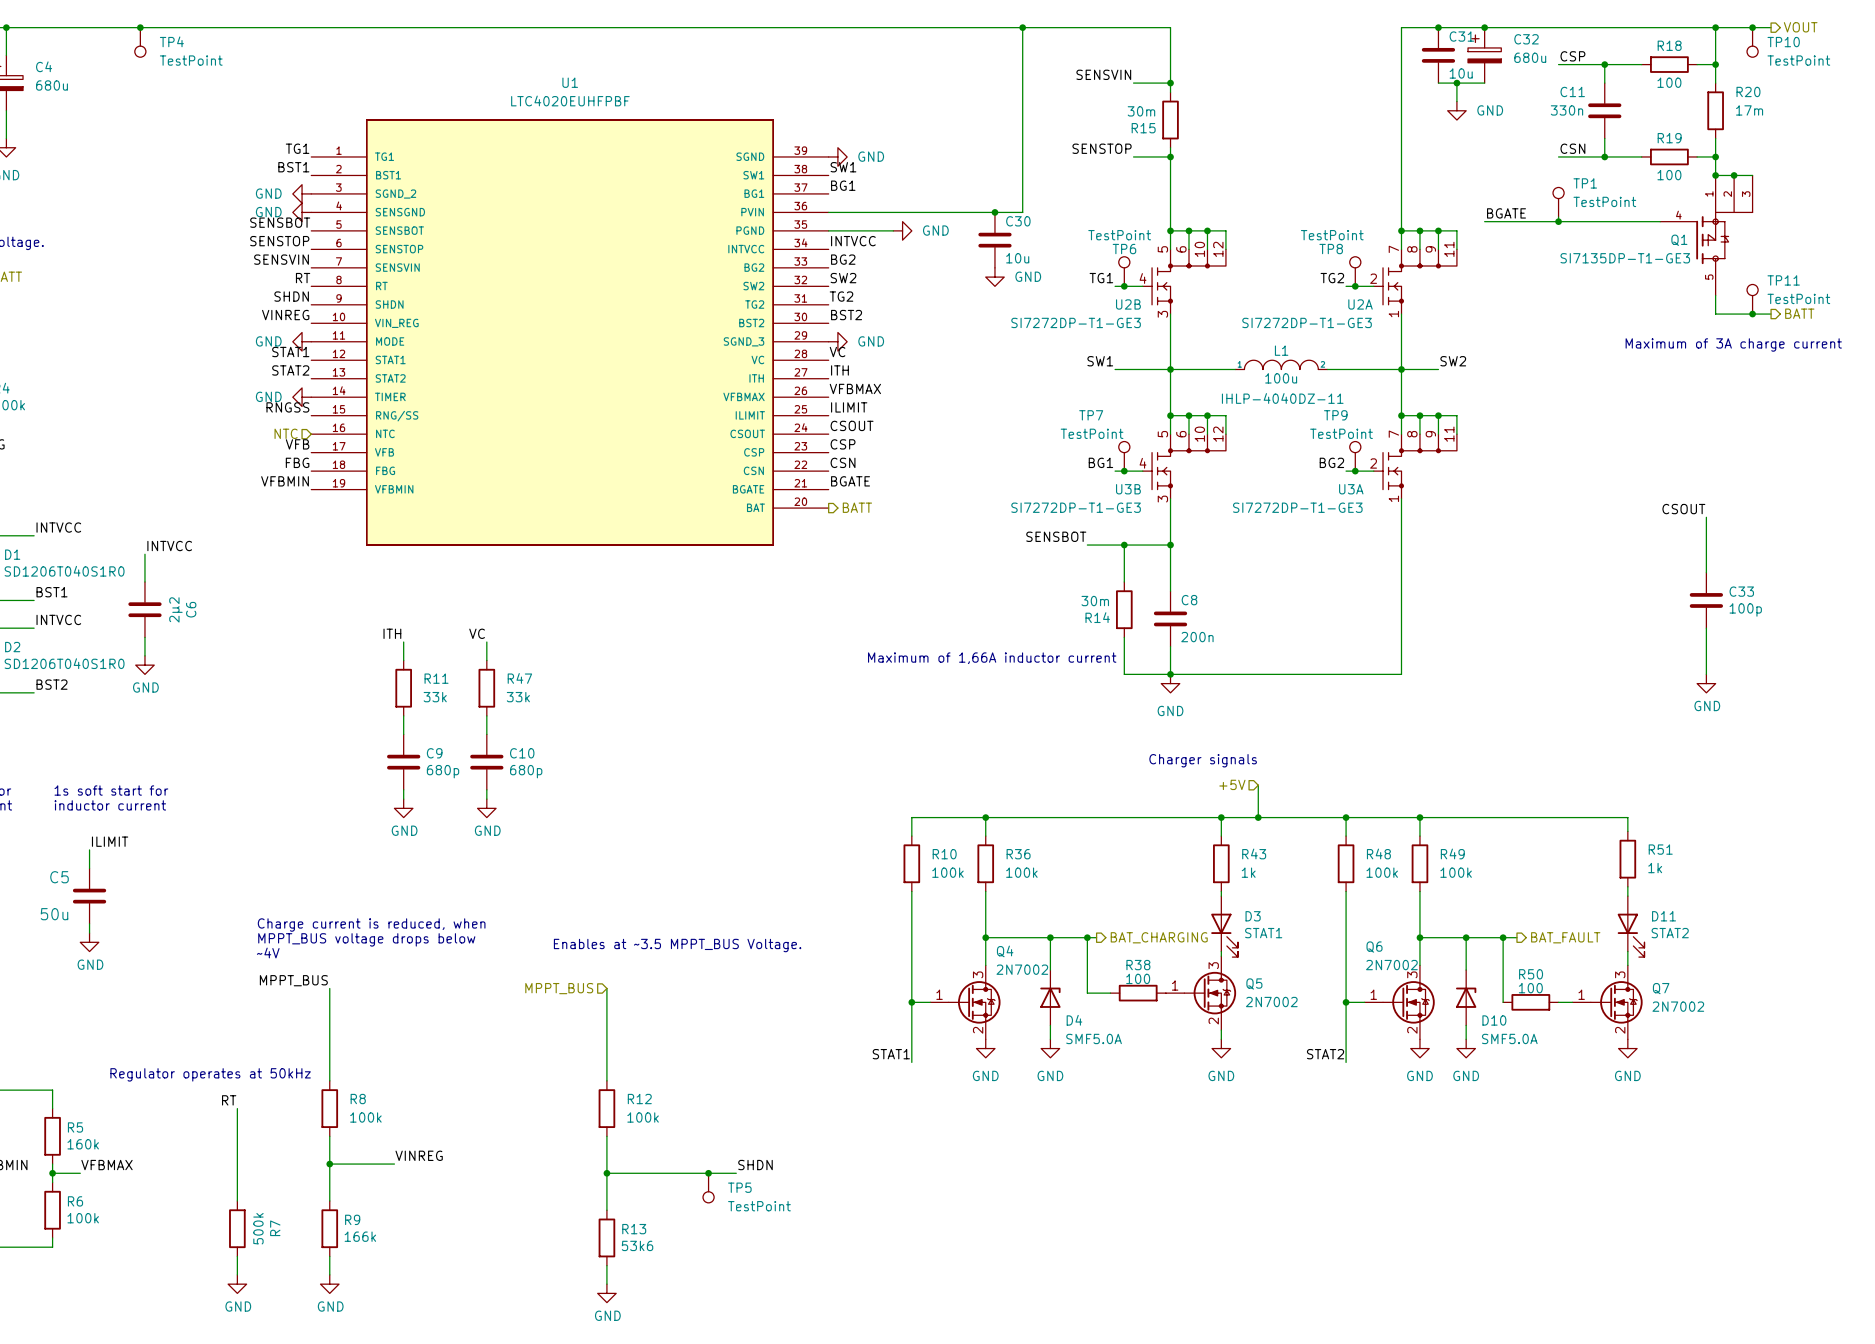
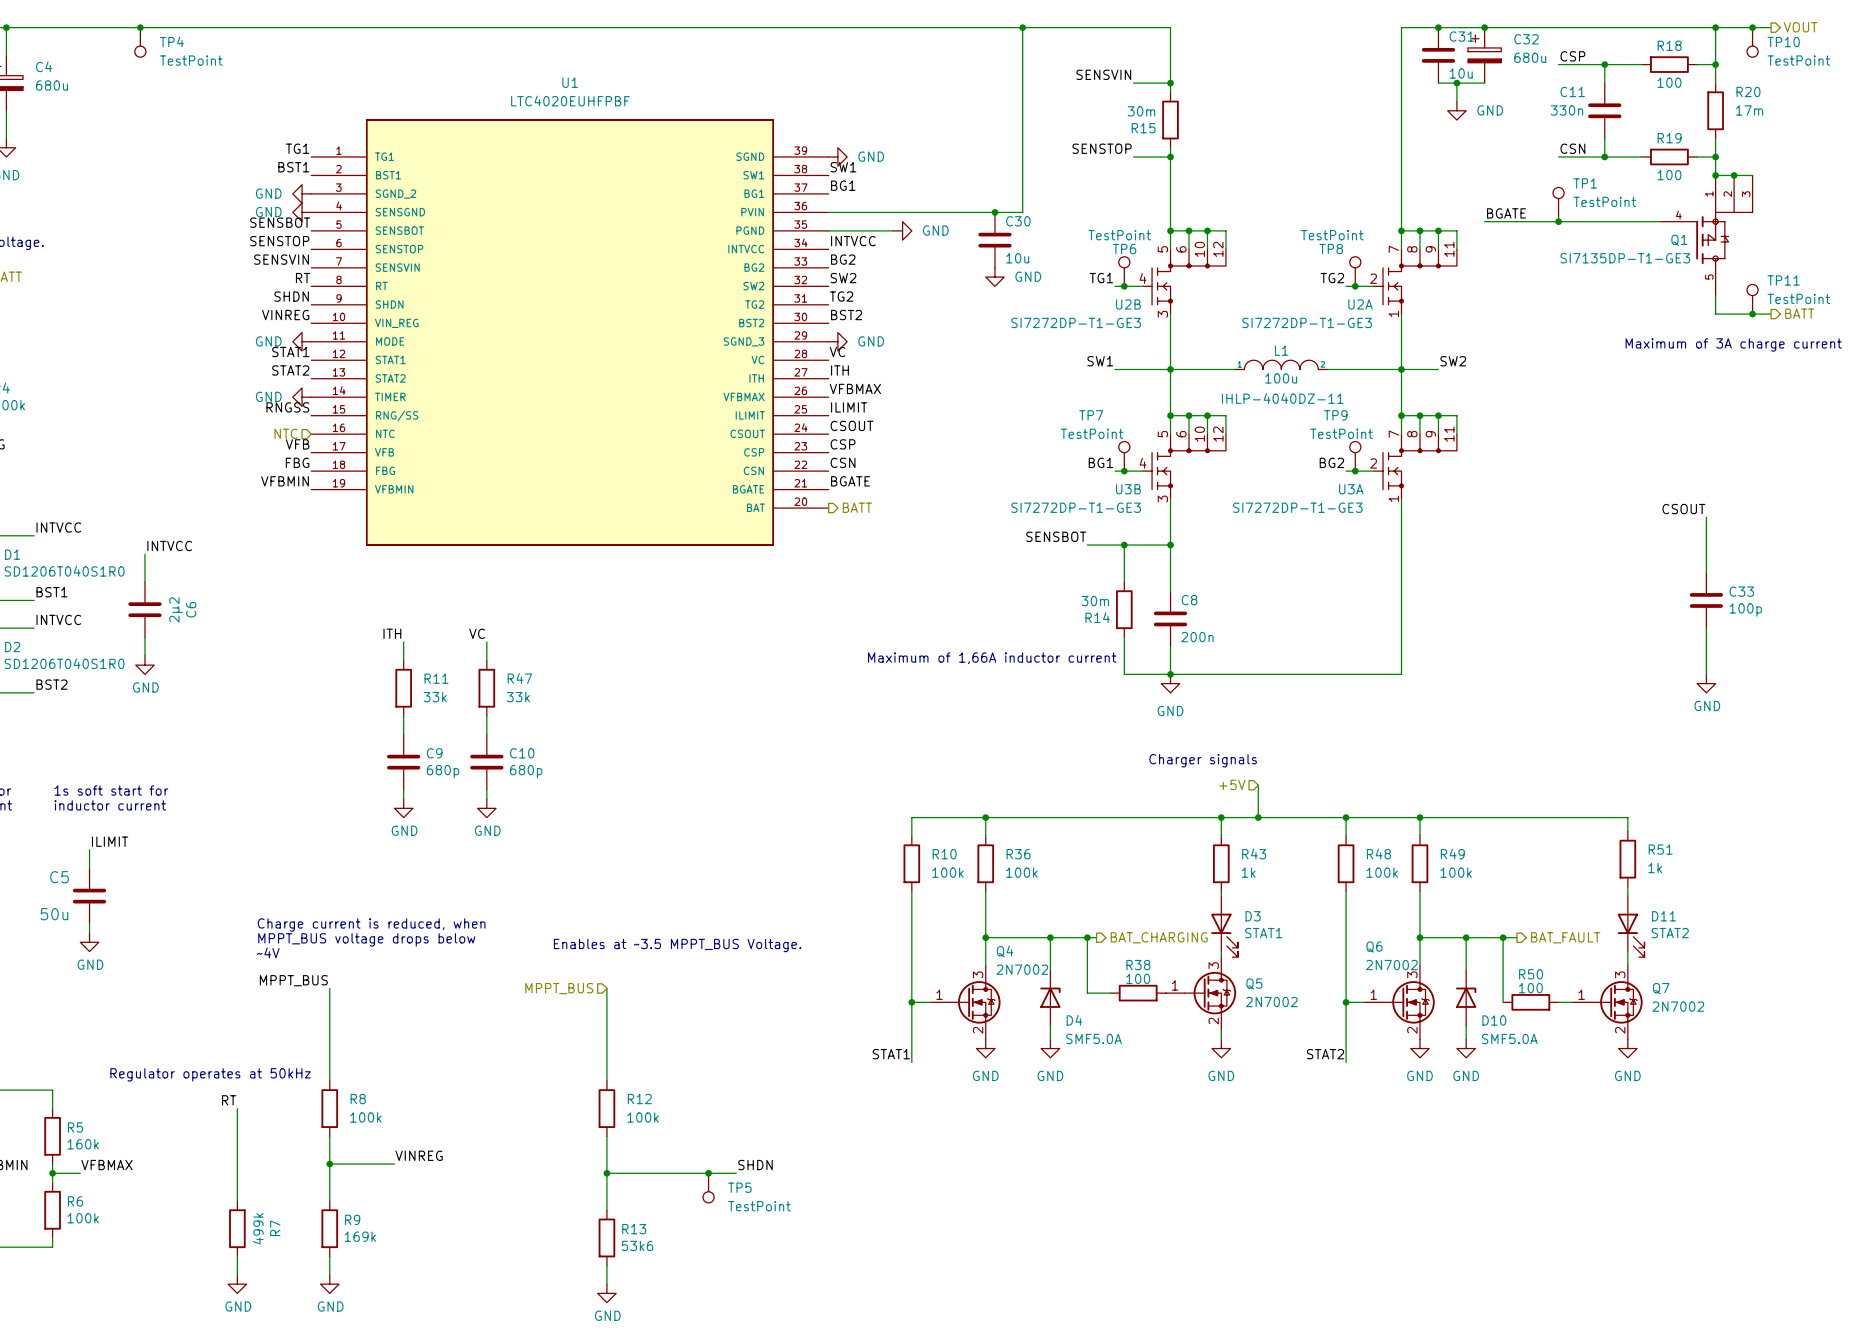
R7 value: 500k (258, 1228) -> 499k (258, 1228)
R9 value: 166k (360, 1236) -> 169k (360, 1236)

